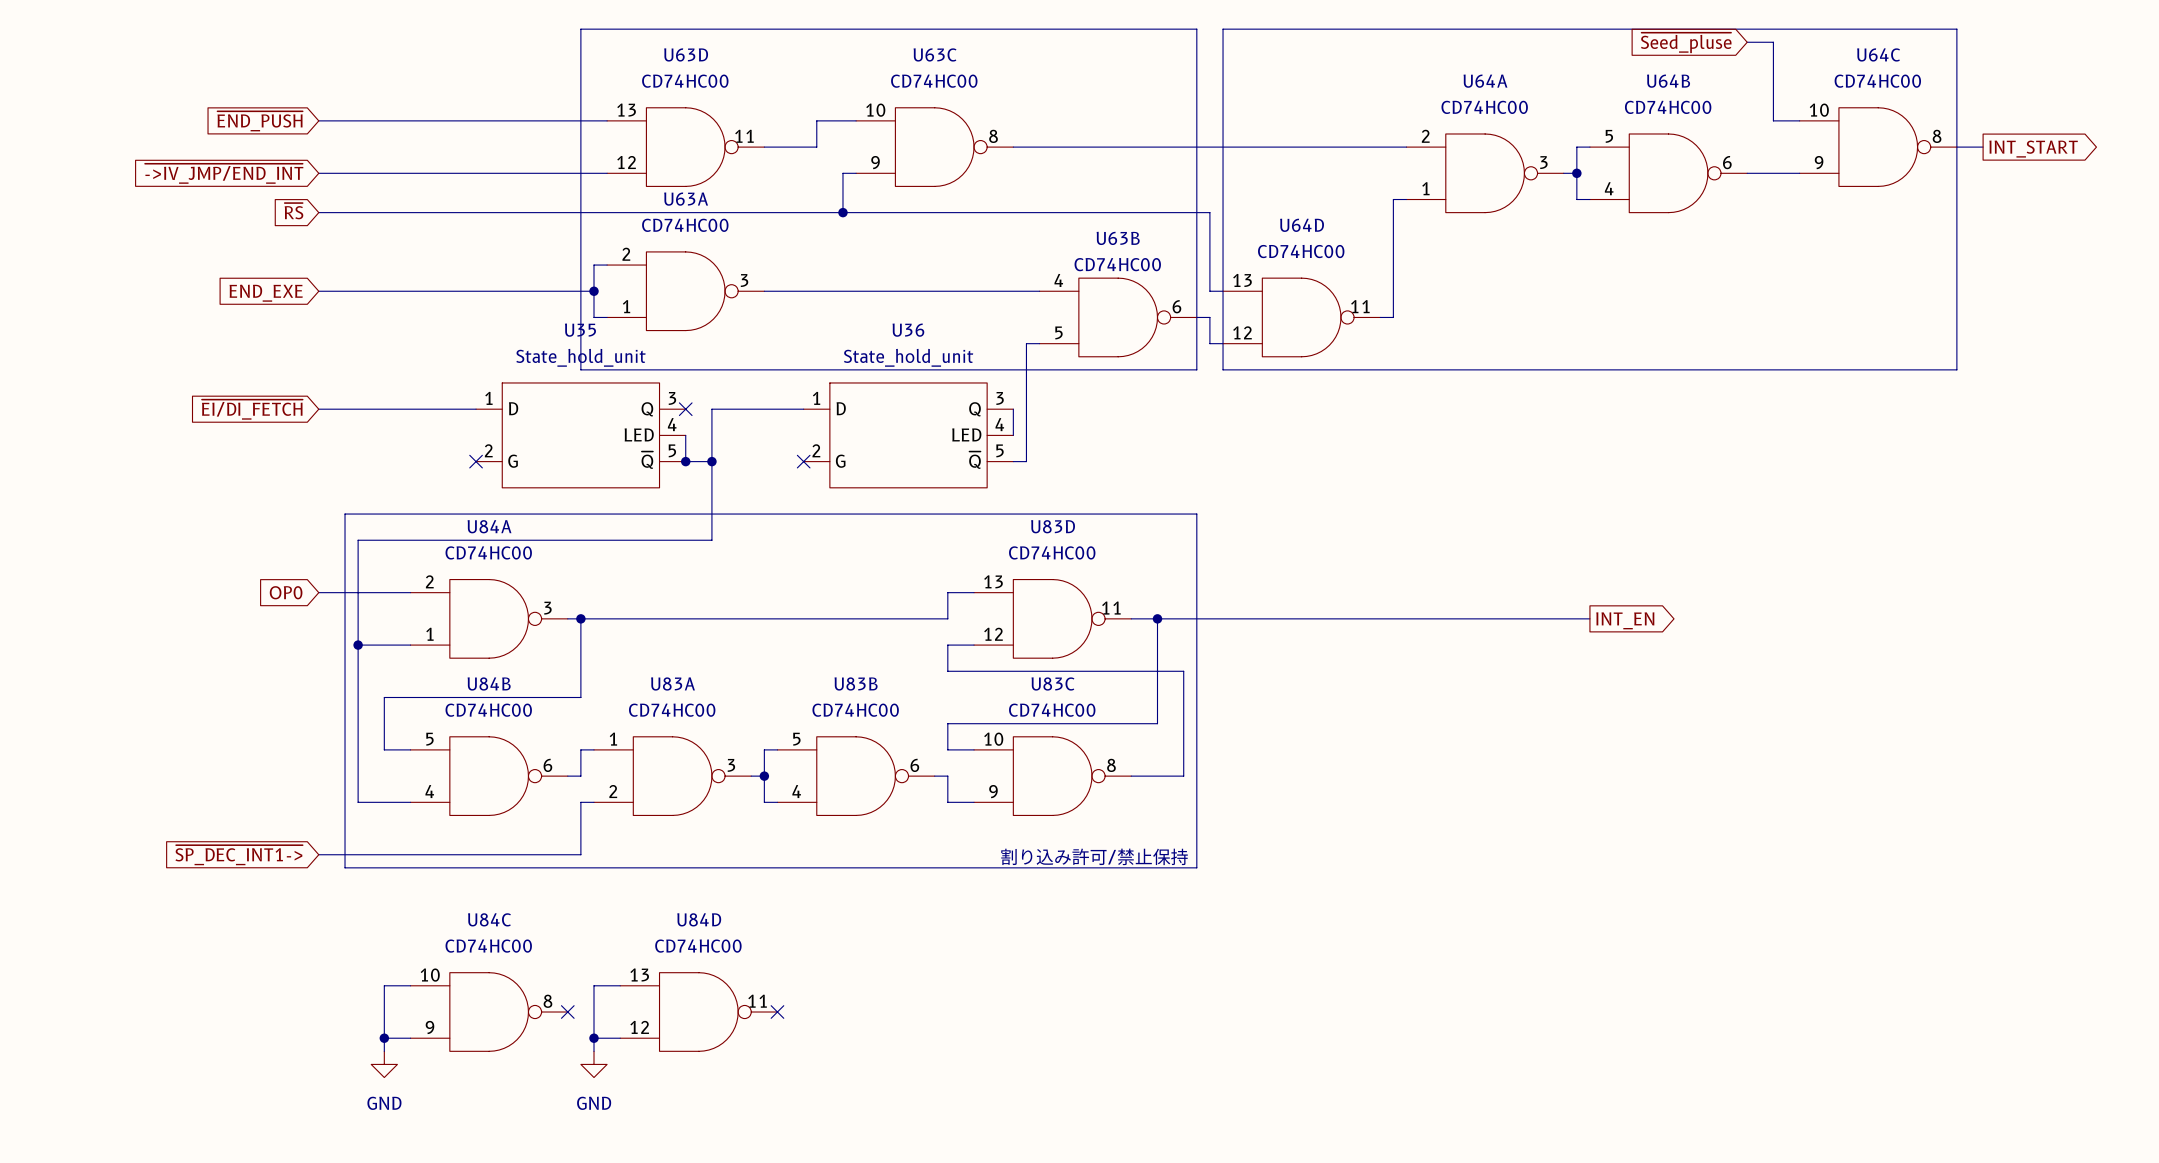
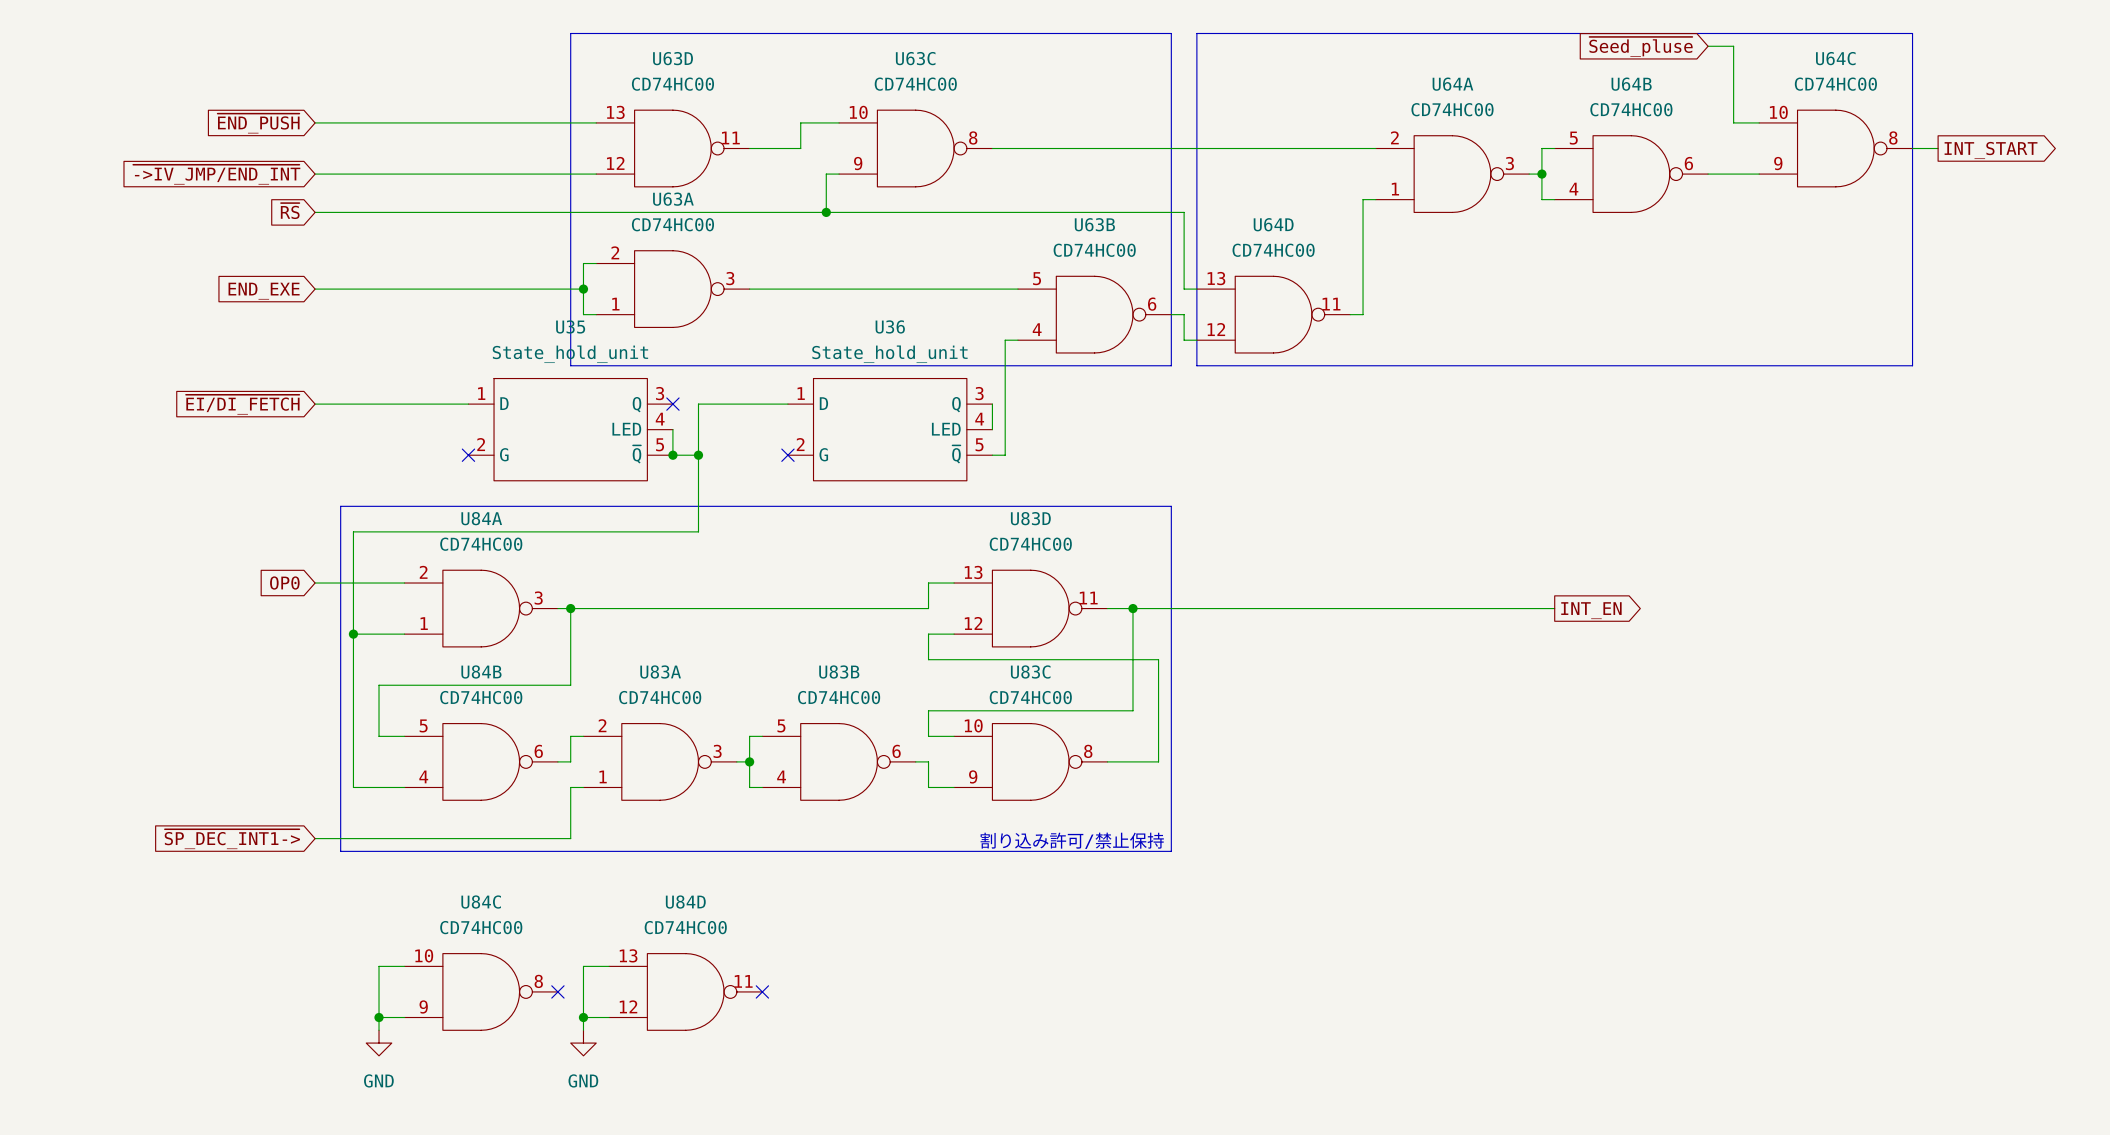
U63B flip: as is (1118, 317) -> up-down (1094, 314)
U83A flip: as is (672, 776) -> up-down (660, 761)

